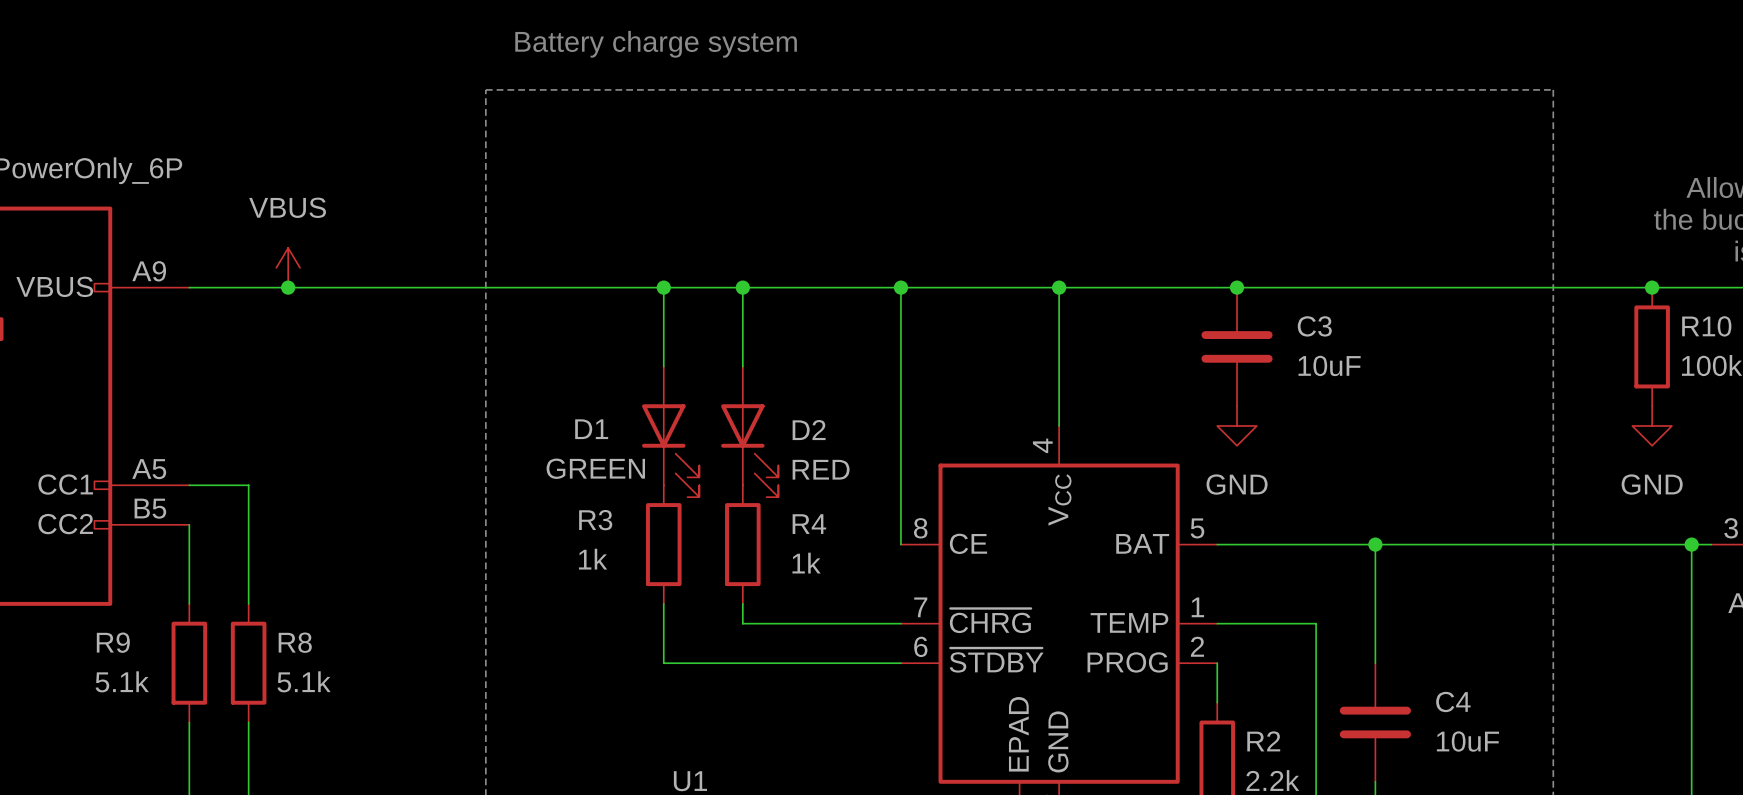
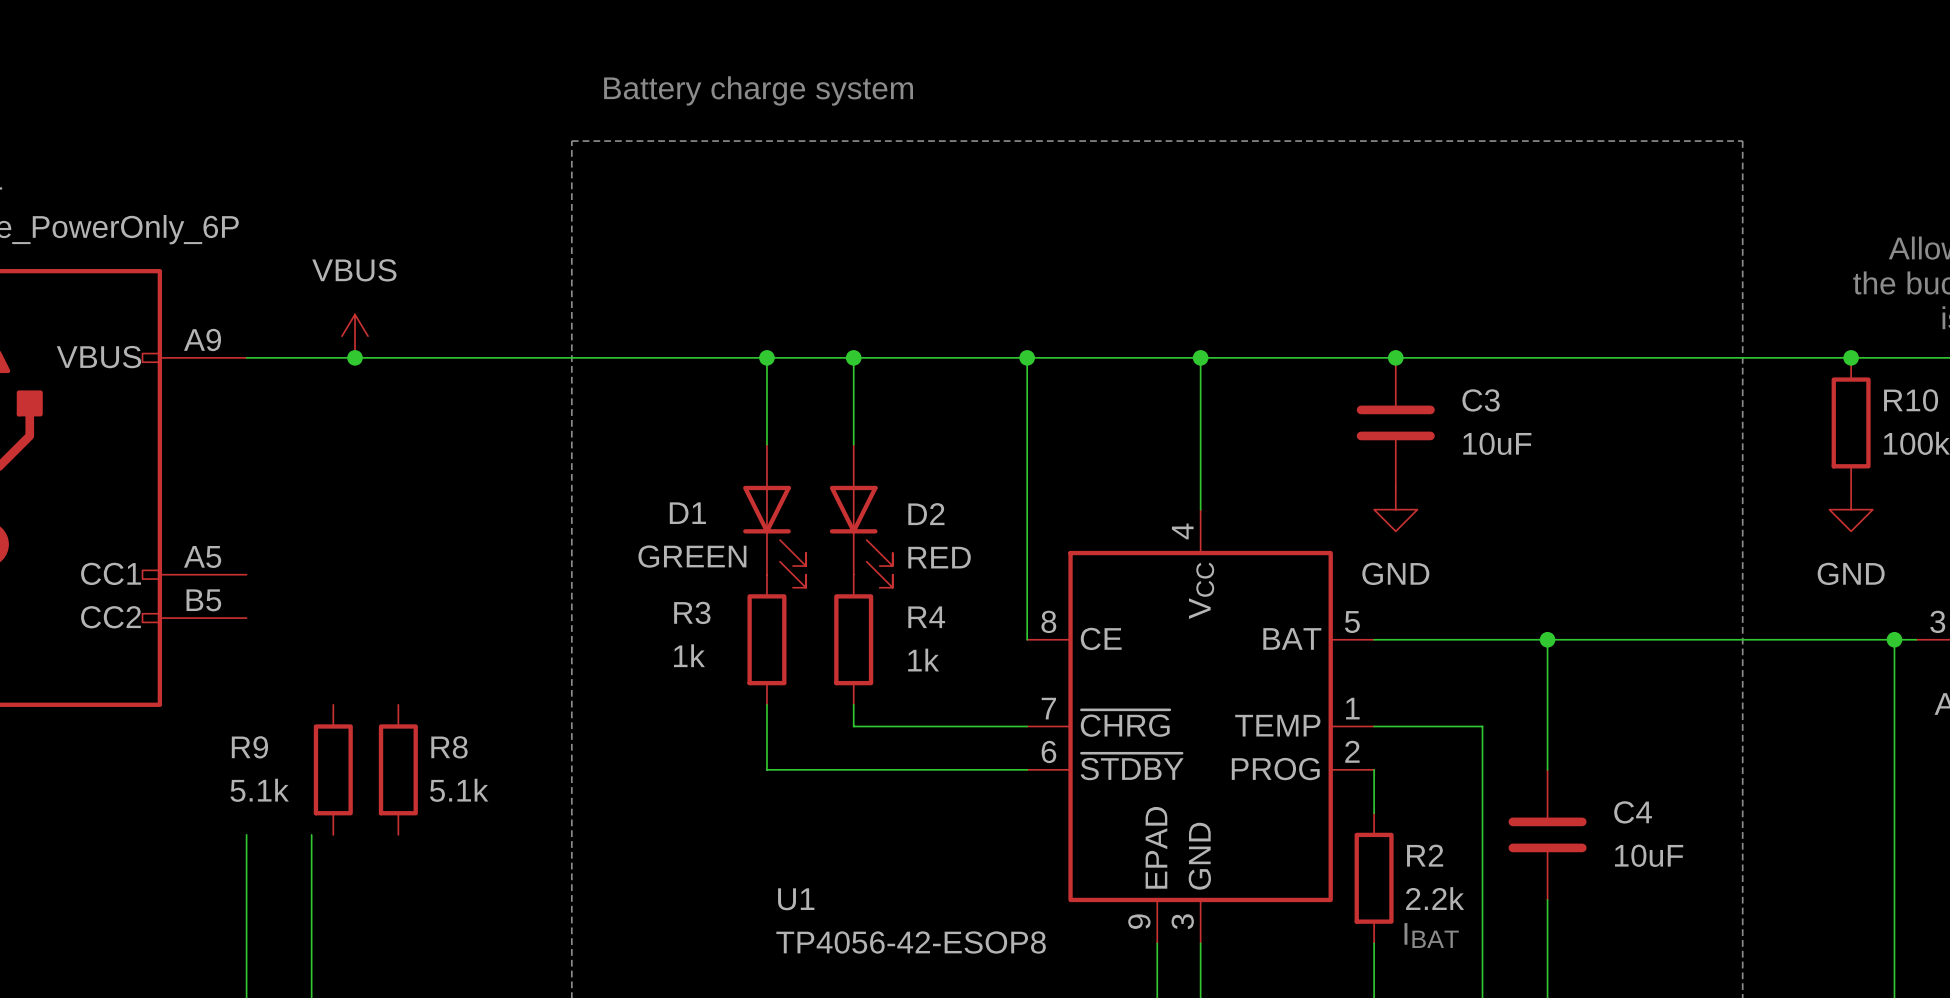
wire: (189, 485) (248, 485) (248, 603) -> none
wire: (189, 524) (189, 603) -> none
R9 position: (189, 663) -> (333, 769)
R8 position: (248, 663) -> (398, 769)

